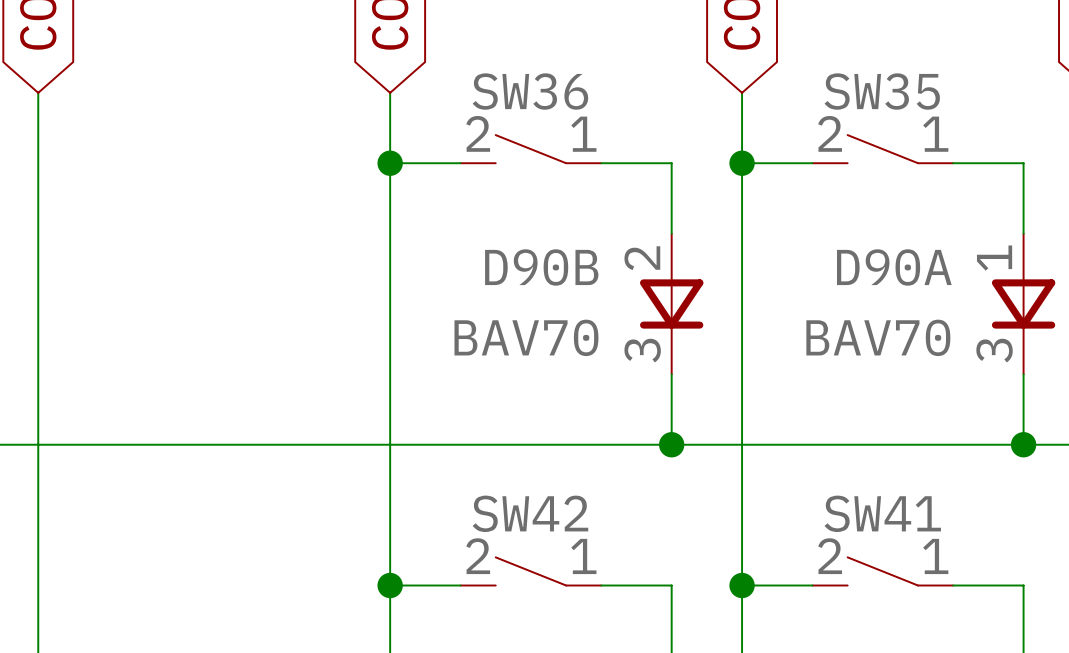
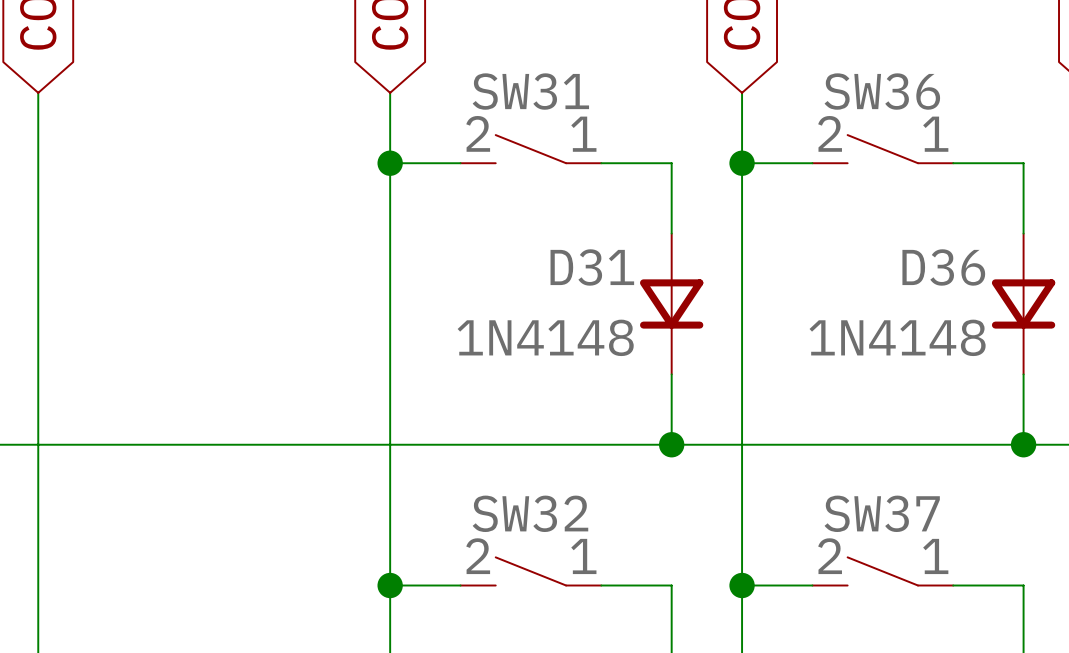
SW36 name: SW36 (530, 91) -> SW31 (530, 91)
SW35 name: SW35 (882, 91) -> SW36 (882, 91)
D90B pin number: 2 (642, 258) -> none
D90A pin number: 1 (994, 258) -> none
D90B name: D90B (541, 267) -> D31 (592, 267)
D90A name: D90A (894, 267) -> D36 (943, 267)
D90B value: BAV70 (526, 337) -> 1N4148 (545, 337)
D90A value: BAV70 (878, 337) -> 1N4148 (897, 337)
D90B pin number: 3 (642, 350) -> none
D90A pin number: 3 (994, 350) -> none
SW42 name: SW42 (530, 513) -> SW32 (530, 513)
SW41 name: SW41 (882, 513) -> SW37 (882, 513)

